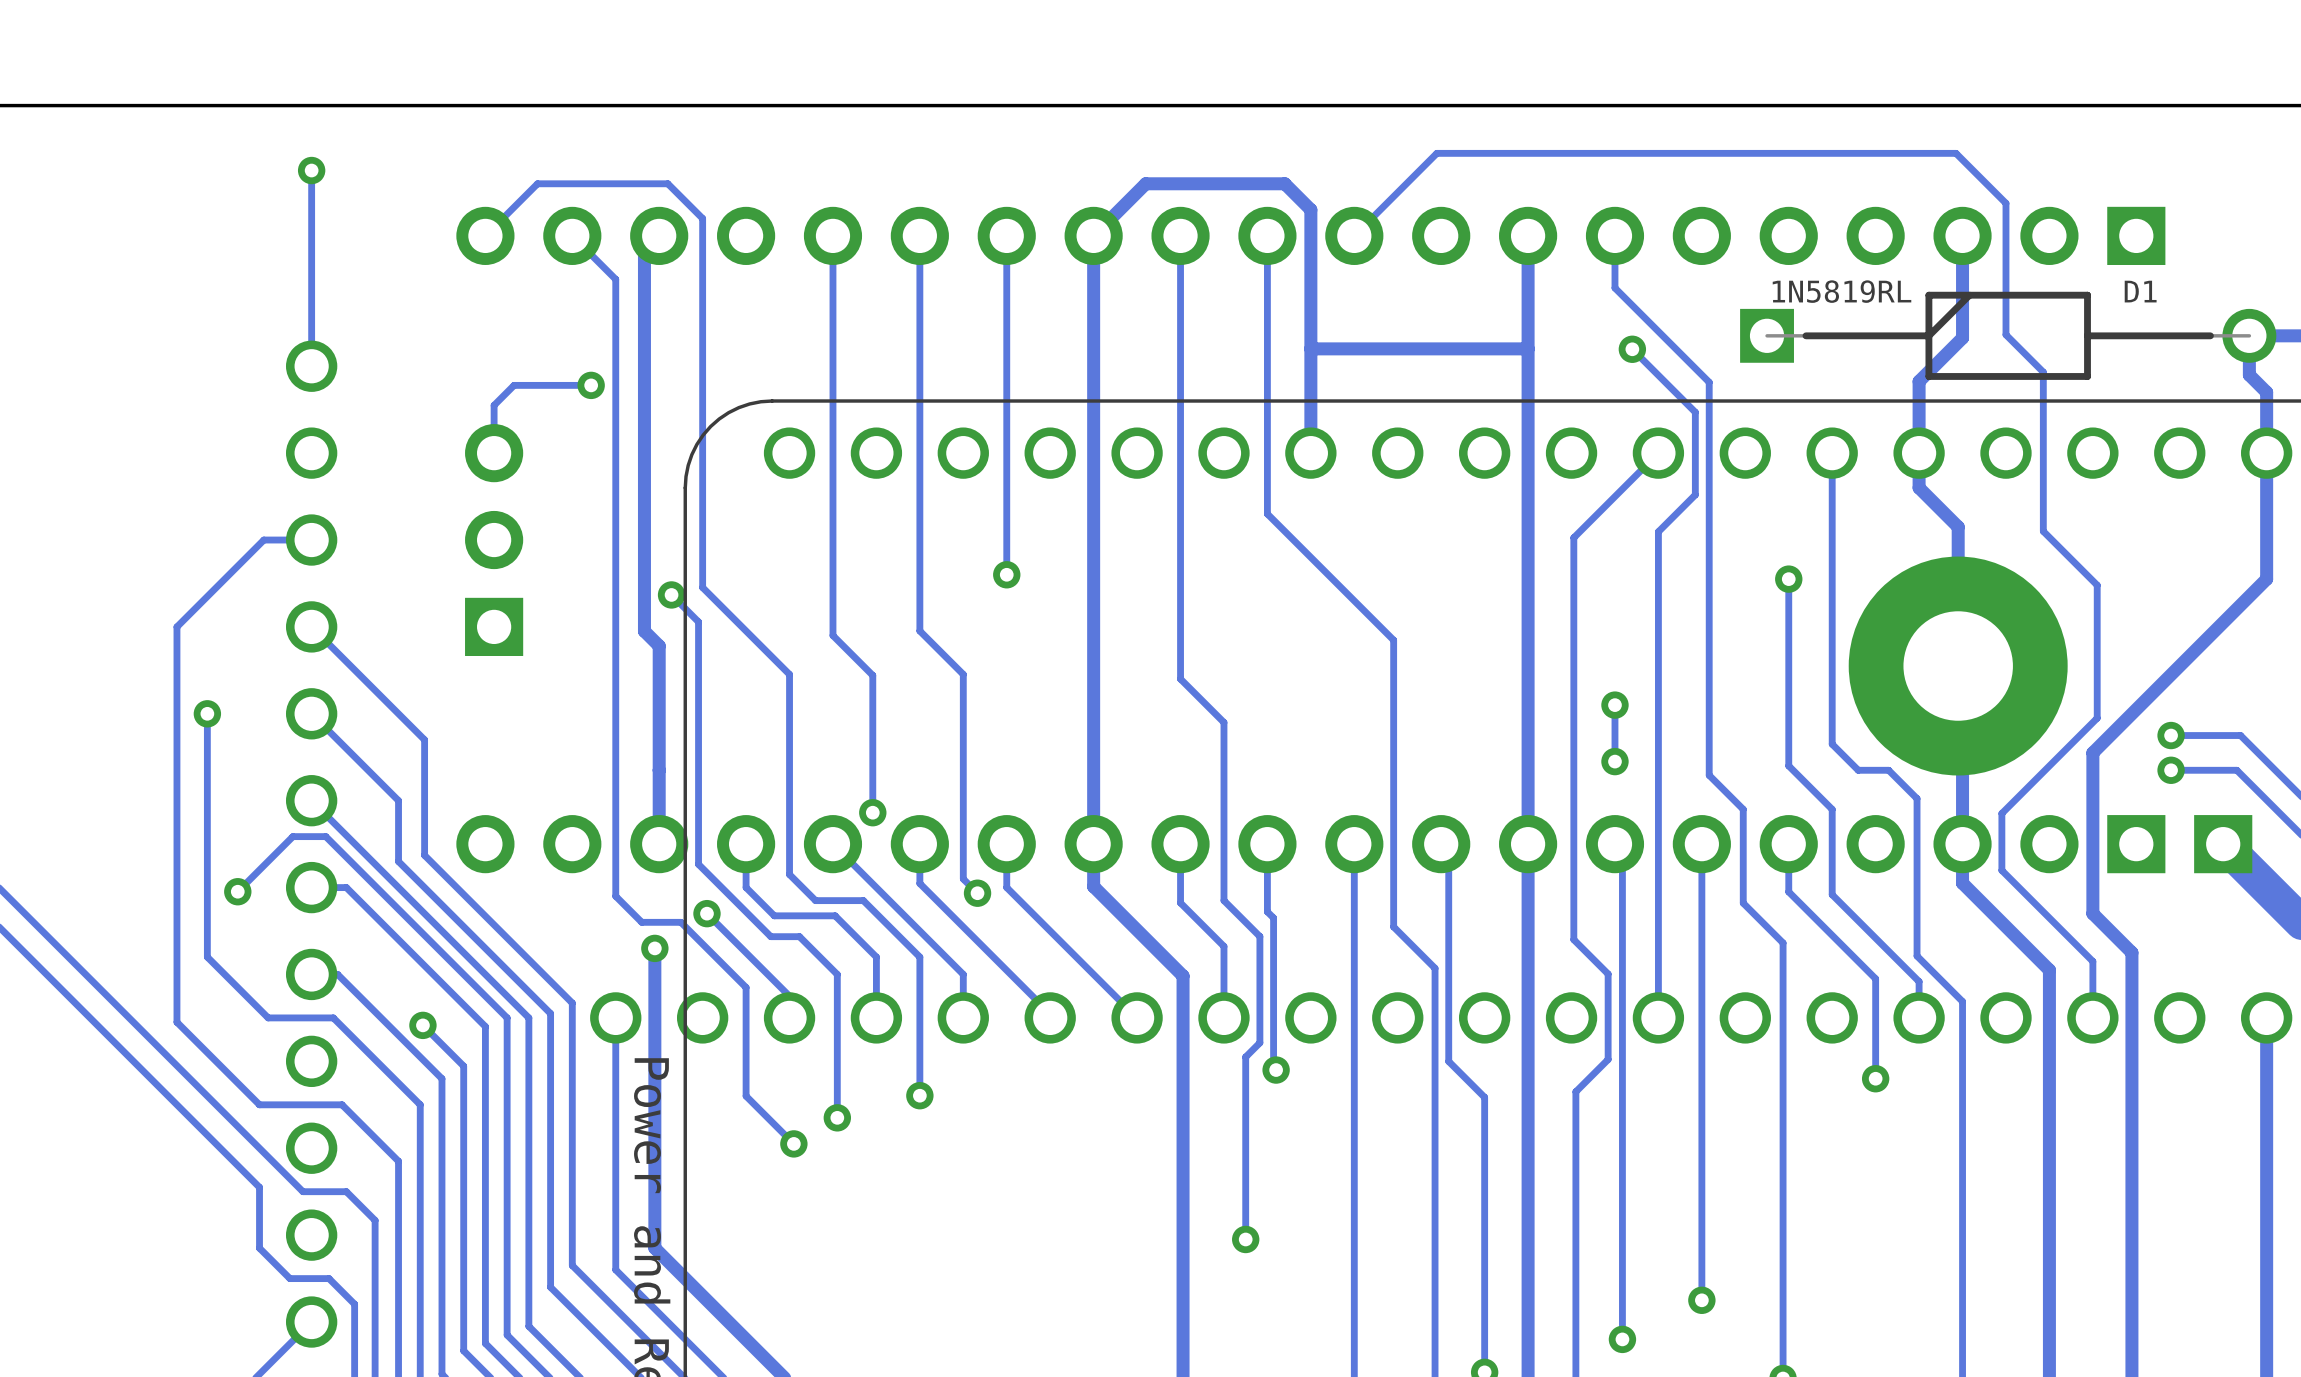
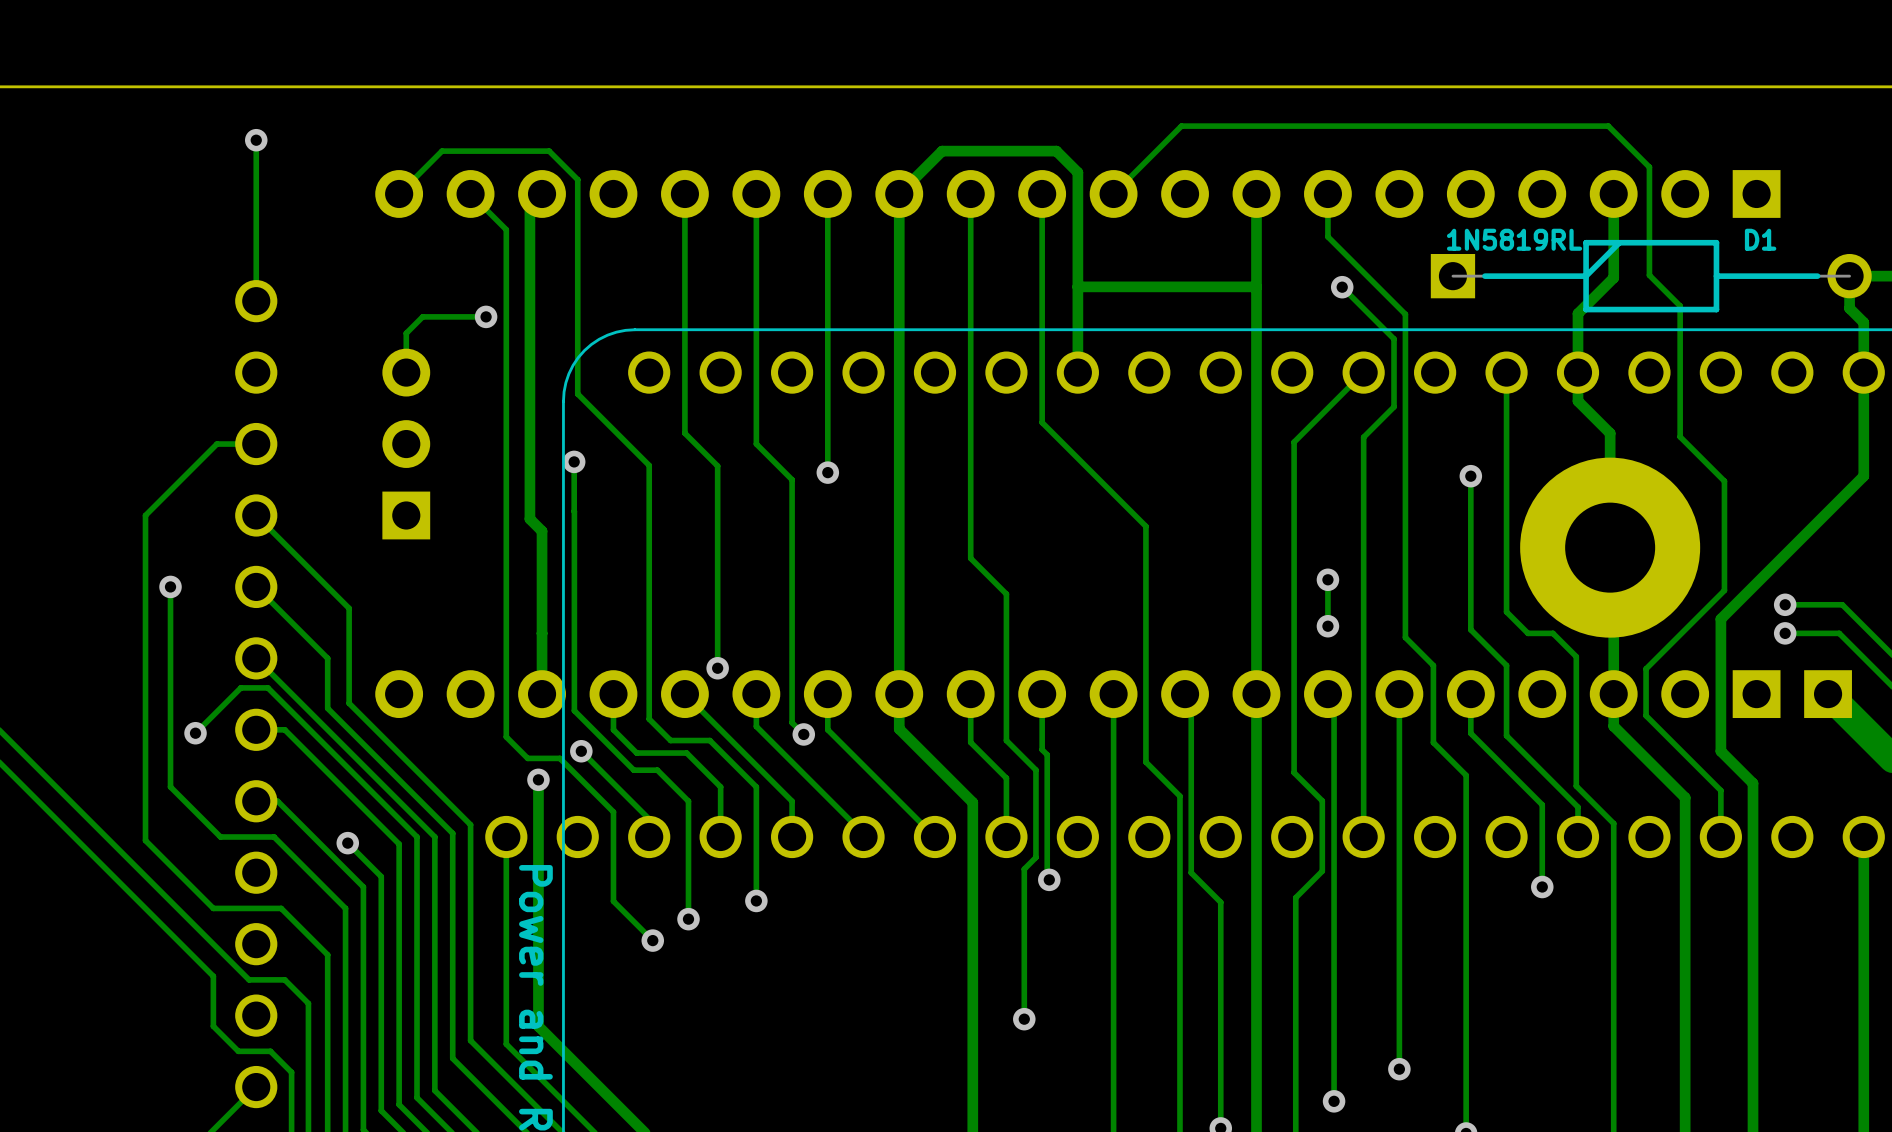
track: (702, 479) (702, 587) (789, 674) -> (577, 394) (649, 465) (649, 554)
track: (832, 526) (832, 635) (872, 675) -> (684, 433) (717, 466) (717, 555)
track: (919, 540) (919, 631) (963, 674) -> (756, 444) (792, 479) (792, 554)
track: (671, 594) (698, 621) -> (574, 461) (574, 511)
via position: (671, 594) -> (574, 461)

